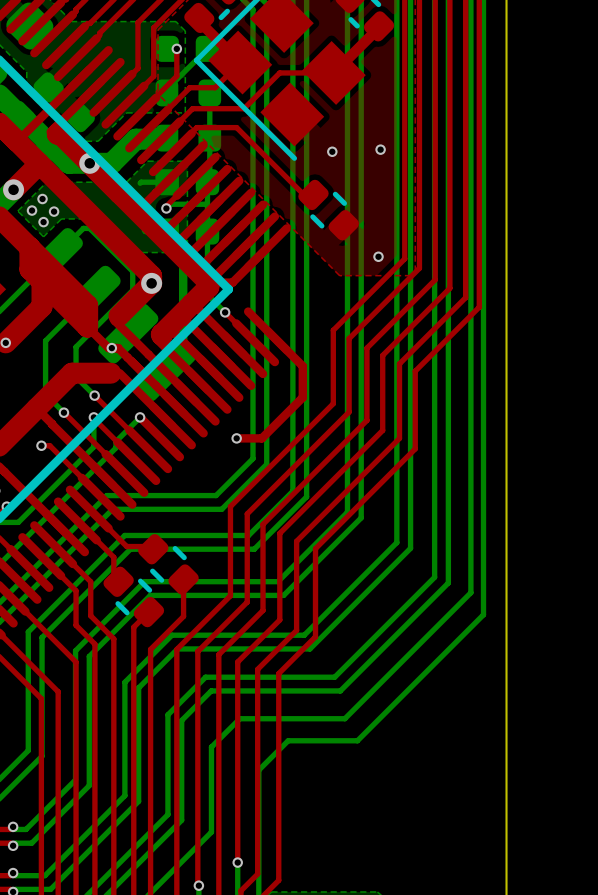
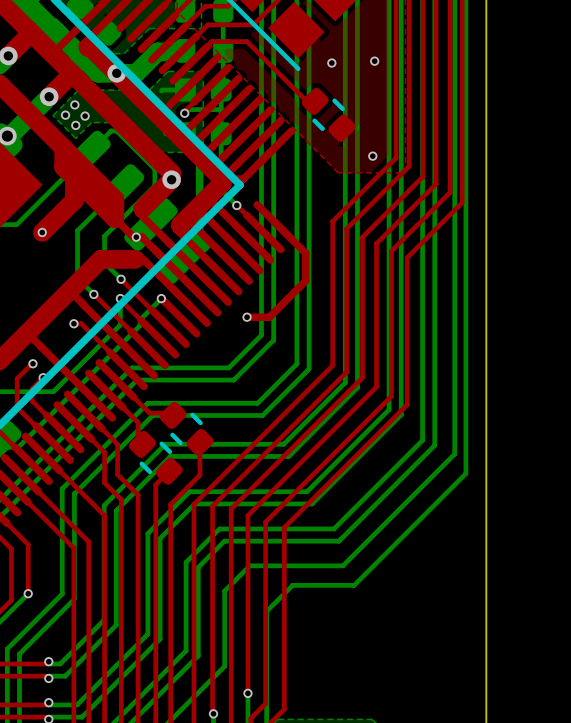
top track: (479, 307) (415, 371) (415, 448) (315, 548) (315, 636) (278, 675) -> (462, 200) (407, 257) (407, 404) (284, 527)
top track: (333, 403) (230, 506) (230, 595) -> (332, 286) (332, 365) (241, 456)
top track: (349, 412) (247, 513) (247, 602) -> (346, 293) (346, 372) (256, 462)
top track: (366, 420) (263, 524) (263, 610) -> (362, 301) (362, 377) (270, 469)
top track: (382, 430) (279, 533) (279, 619) -> (376, 310) (376, 386) (285, 478)
top track: (399, 438) (296, 541) (296, 630) -> (391, 317) (391, 396) (300, 487)

